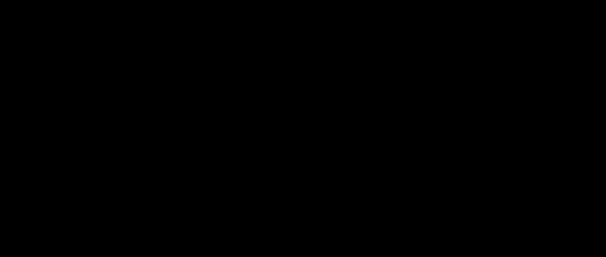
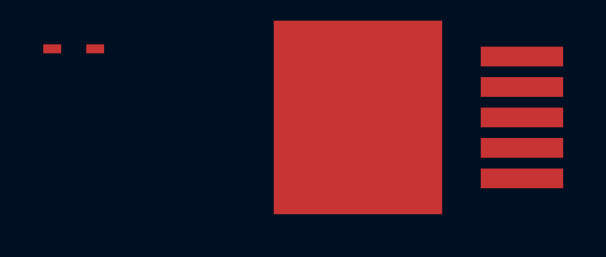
part: none -> (73, 48)
part: none -> (418, 117)

